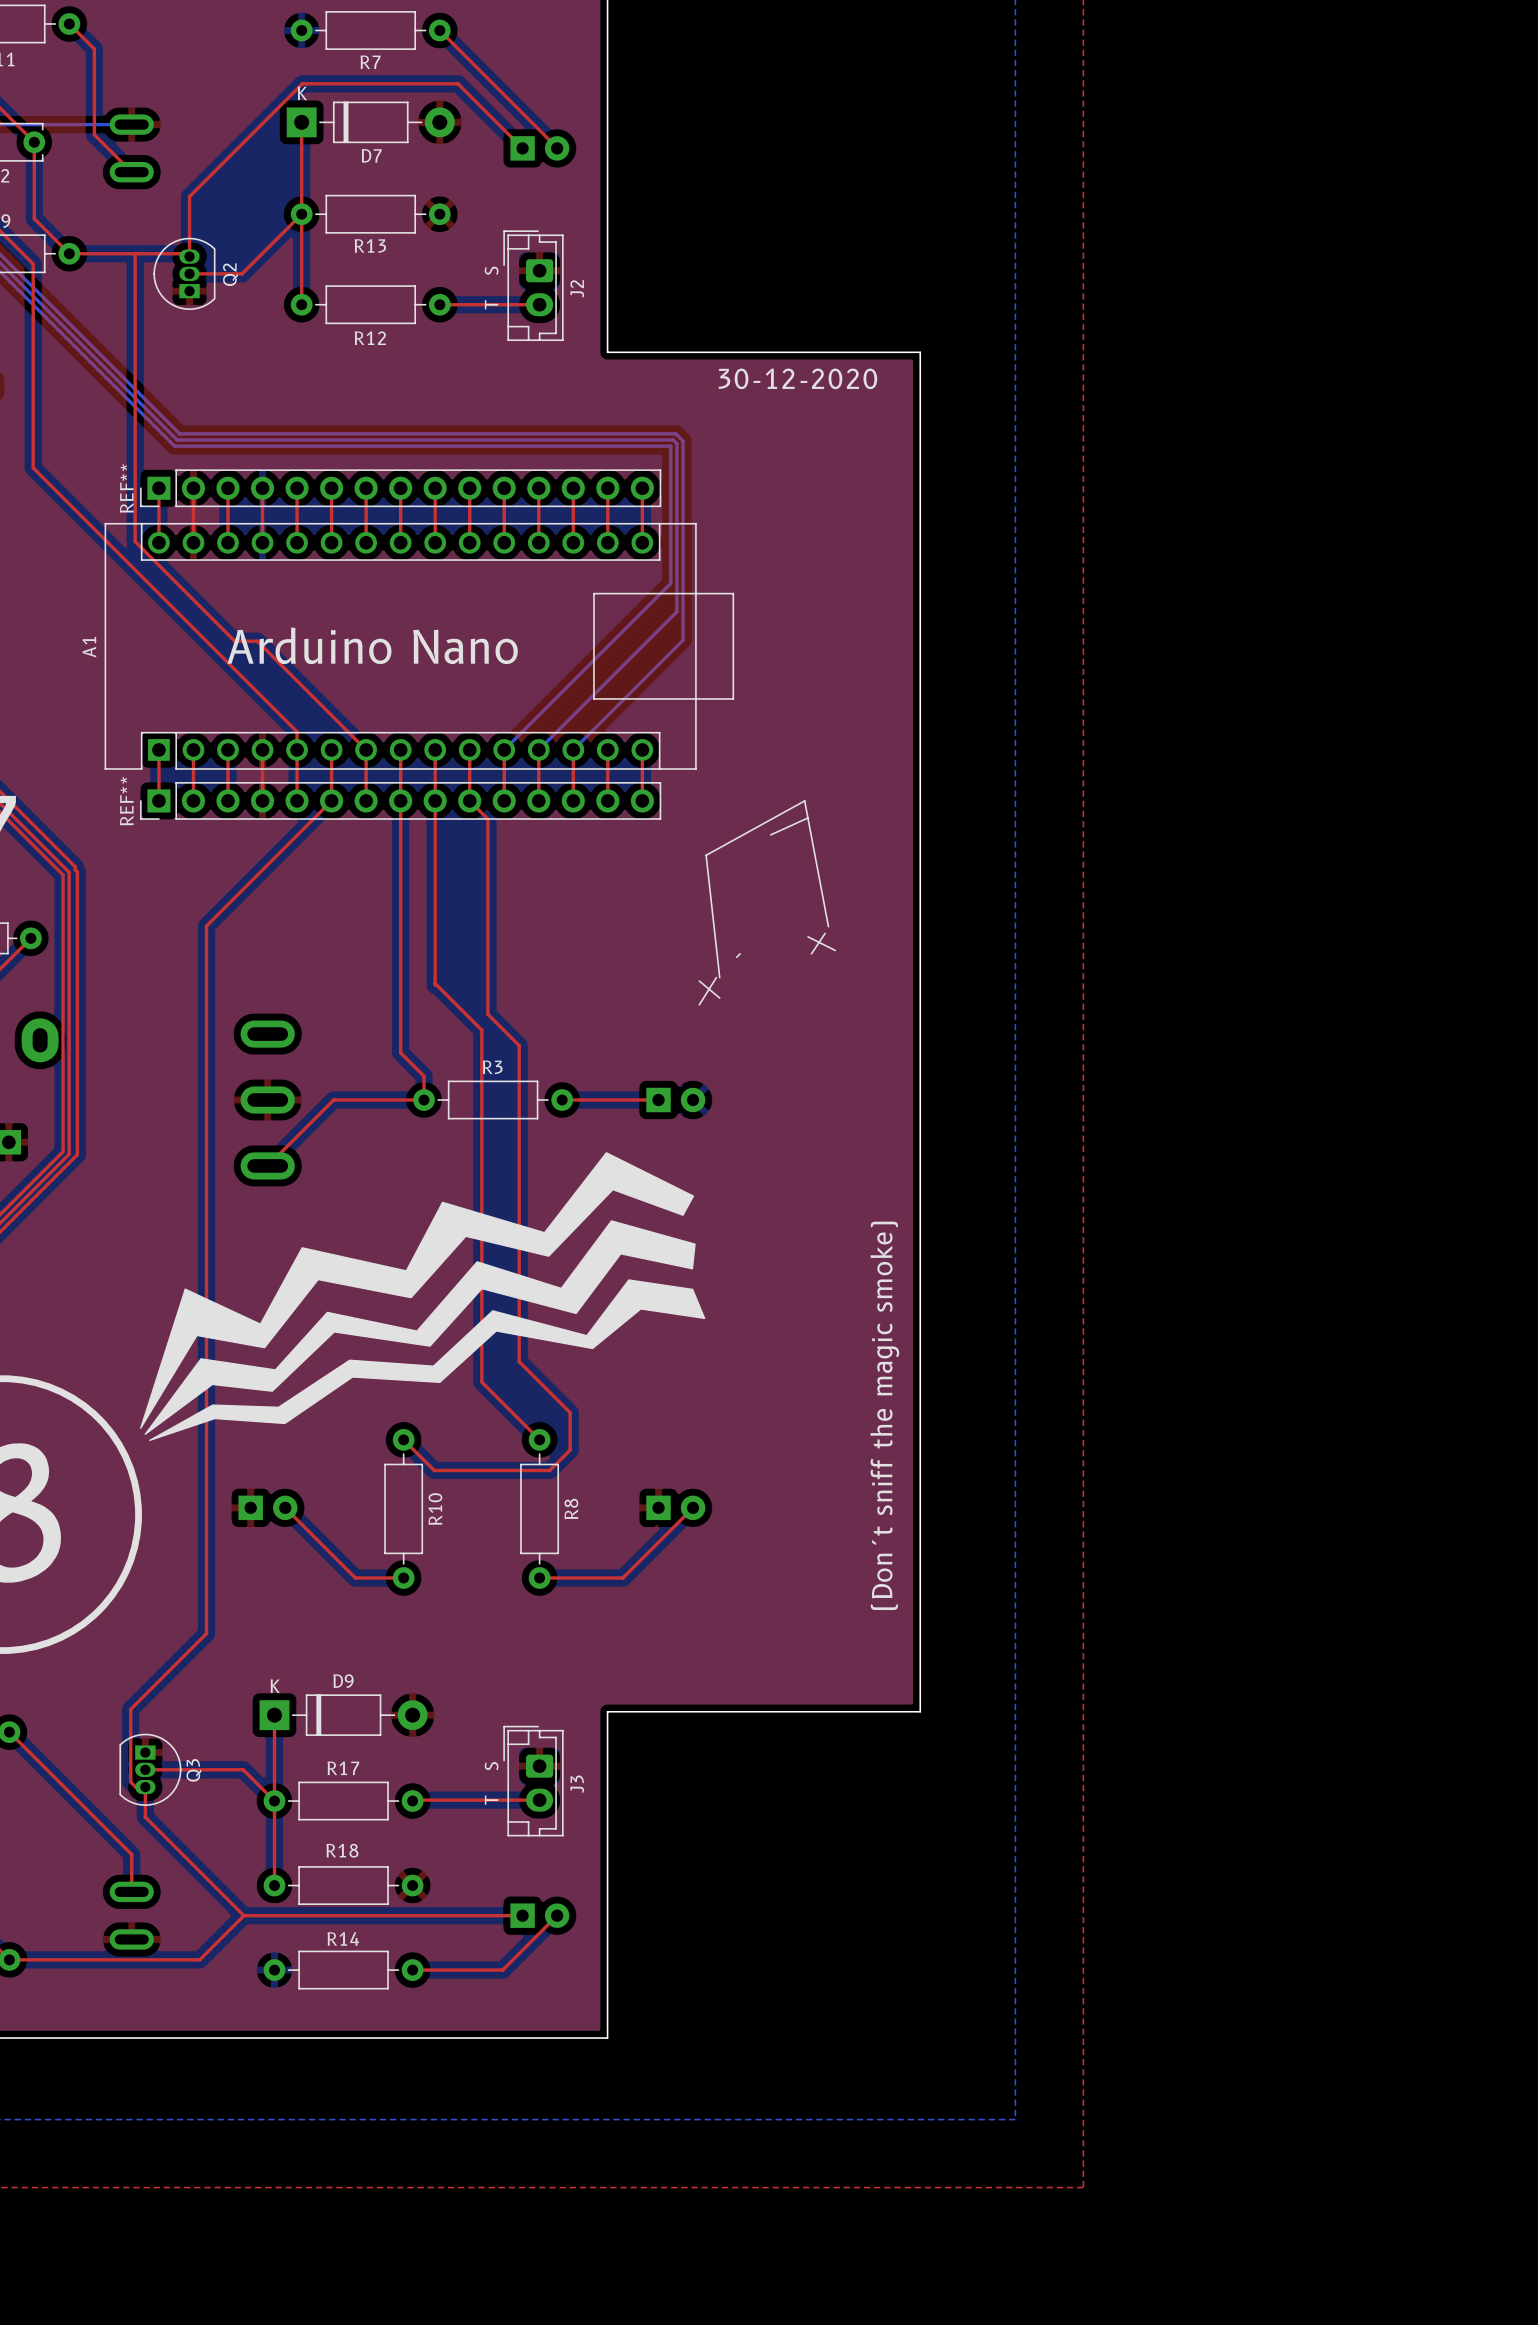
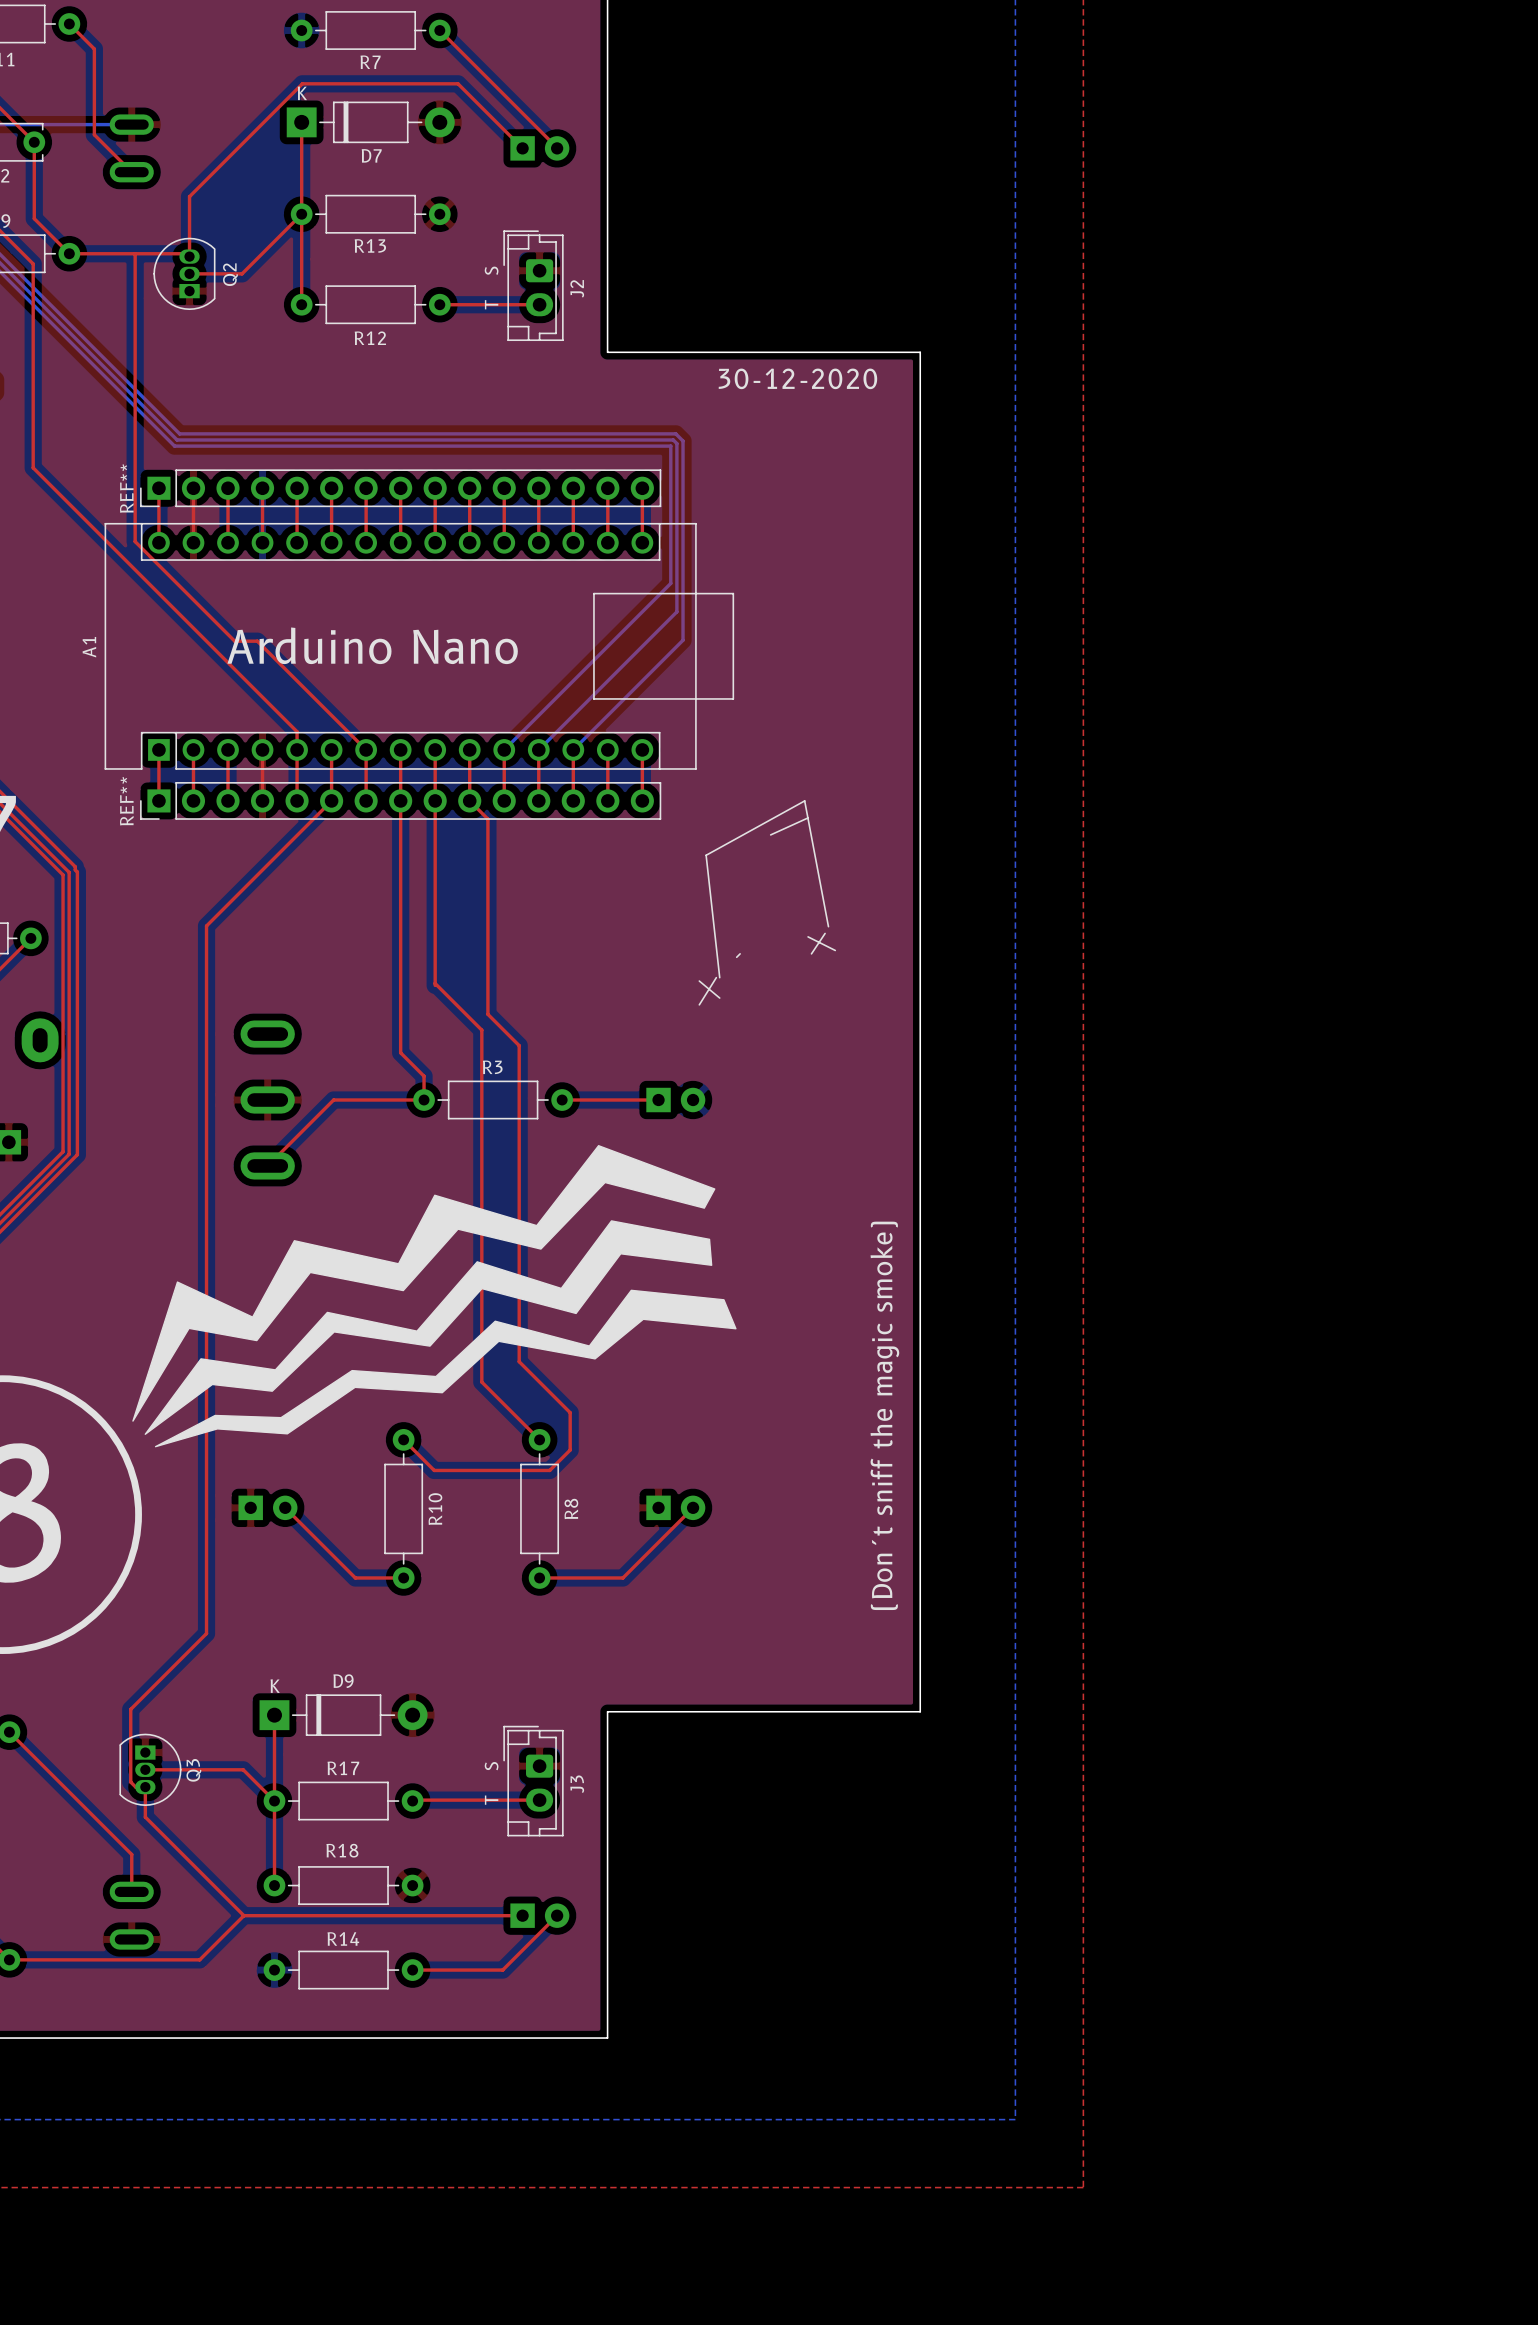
drawing shape: [140, 1152, 695, 1429] -> [132, 1145, 716, 1422]
drawing shape: [144, 1220, 696, 1435] -> [144, 1220, 713, 1435]
drawing: [149, 1279, 706, 1442] -> none
drawing: none -> [154, 1289, 737, 1448]

